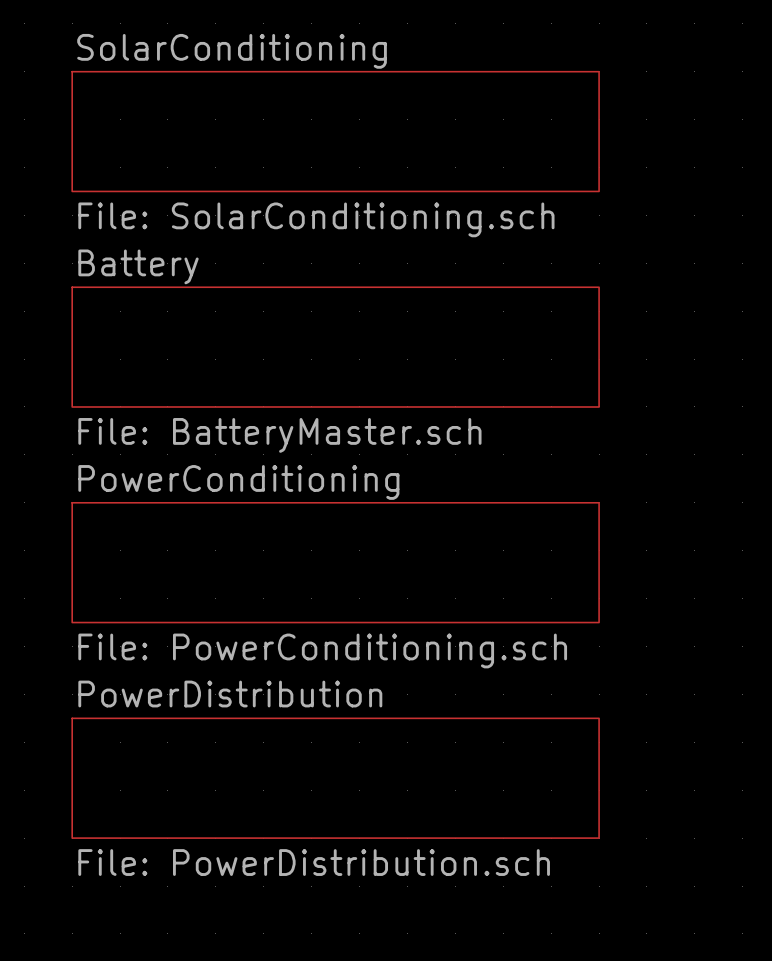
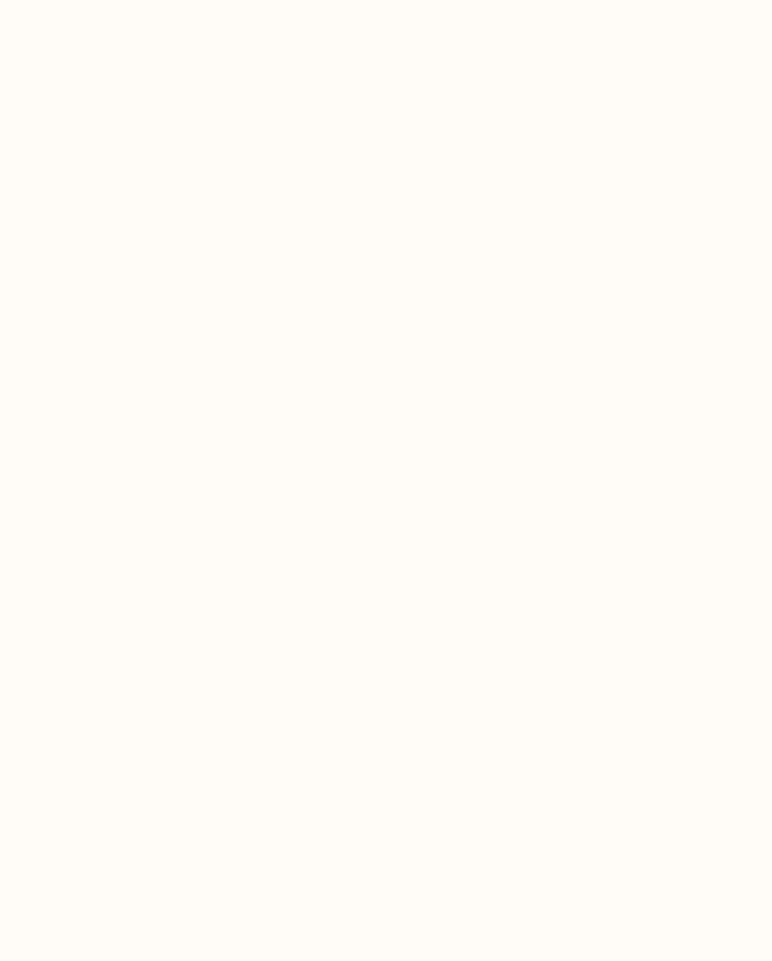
sheet SolarConditioning: File: SolarConditioning.sch (335, 131) -> none
sheet Battery: File: BatteryMaster.sch (335, 347) -> none
sheet PowerConditioning: File: PowerConditioning.sch (335, 562) -> none
sheet PowerDistribution: File: PowerDistribution.sch (335, 778) -> none

